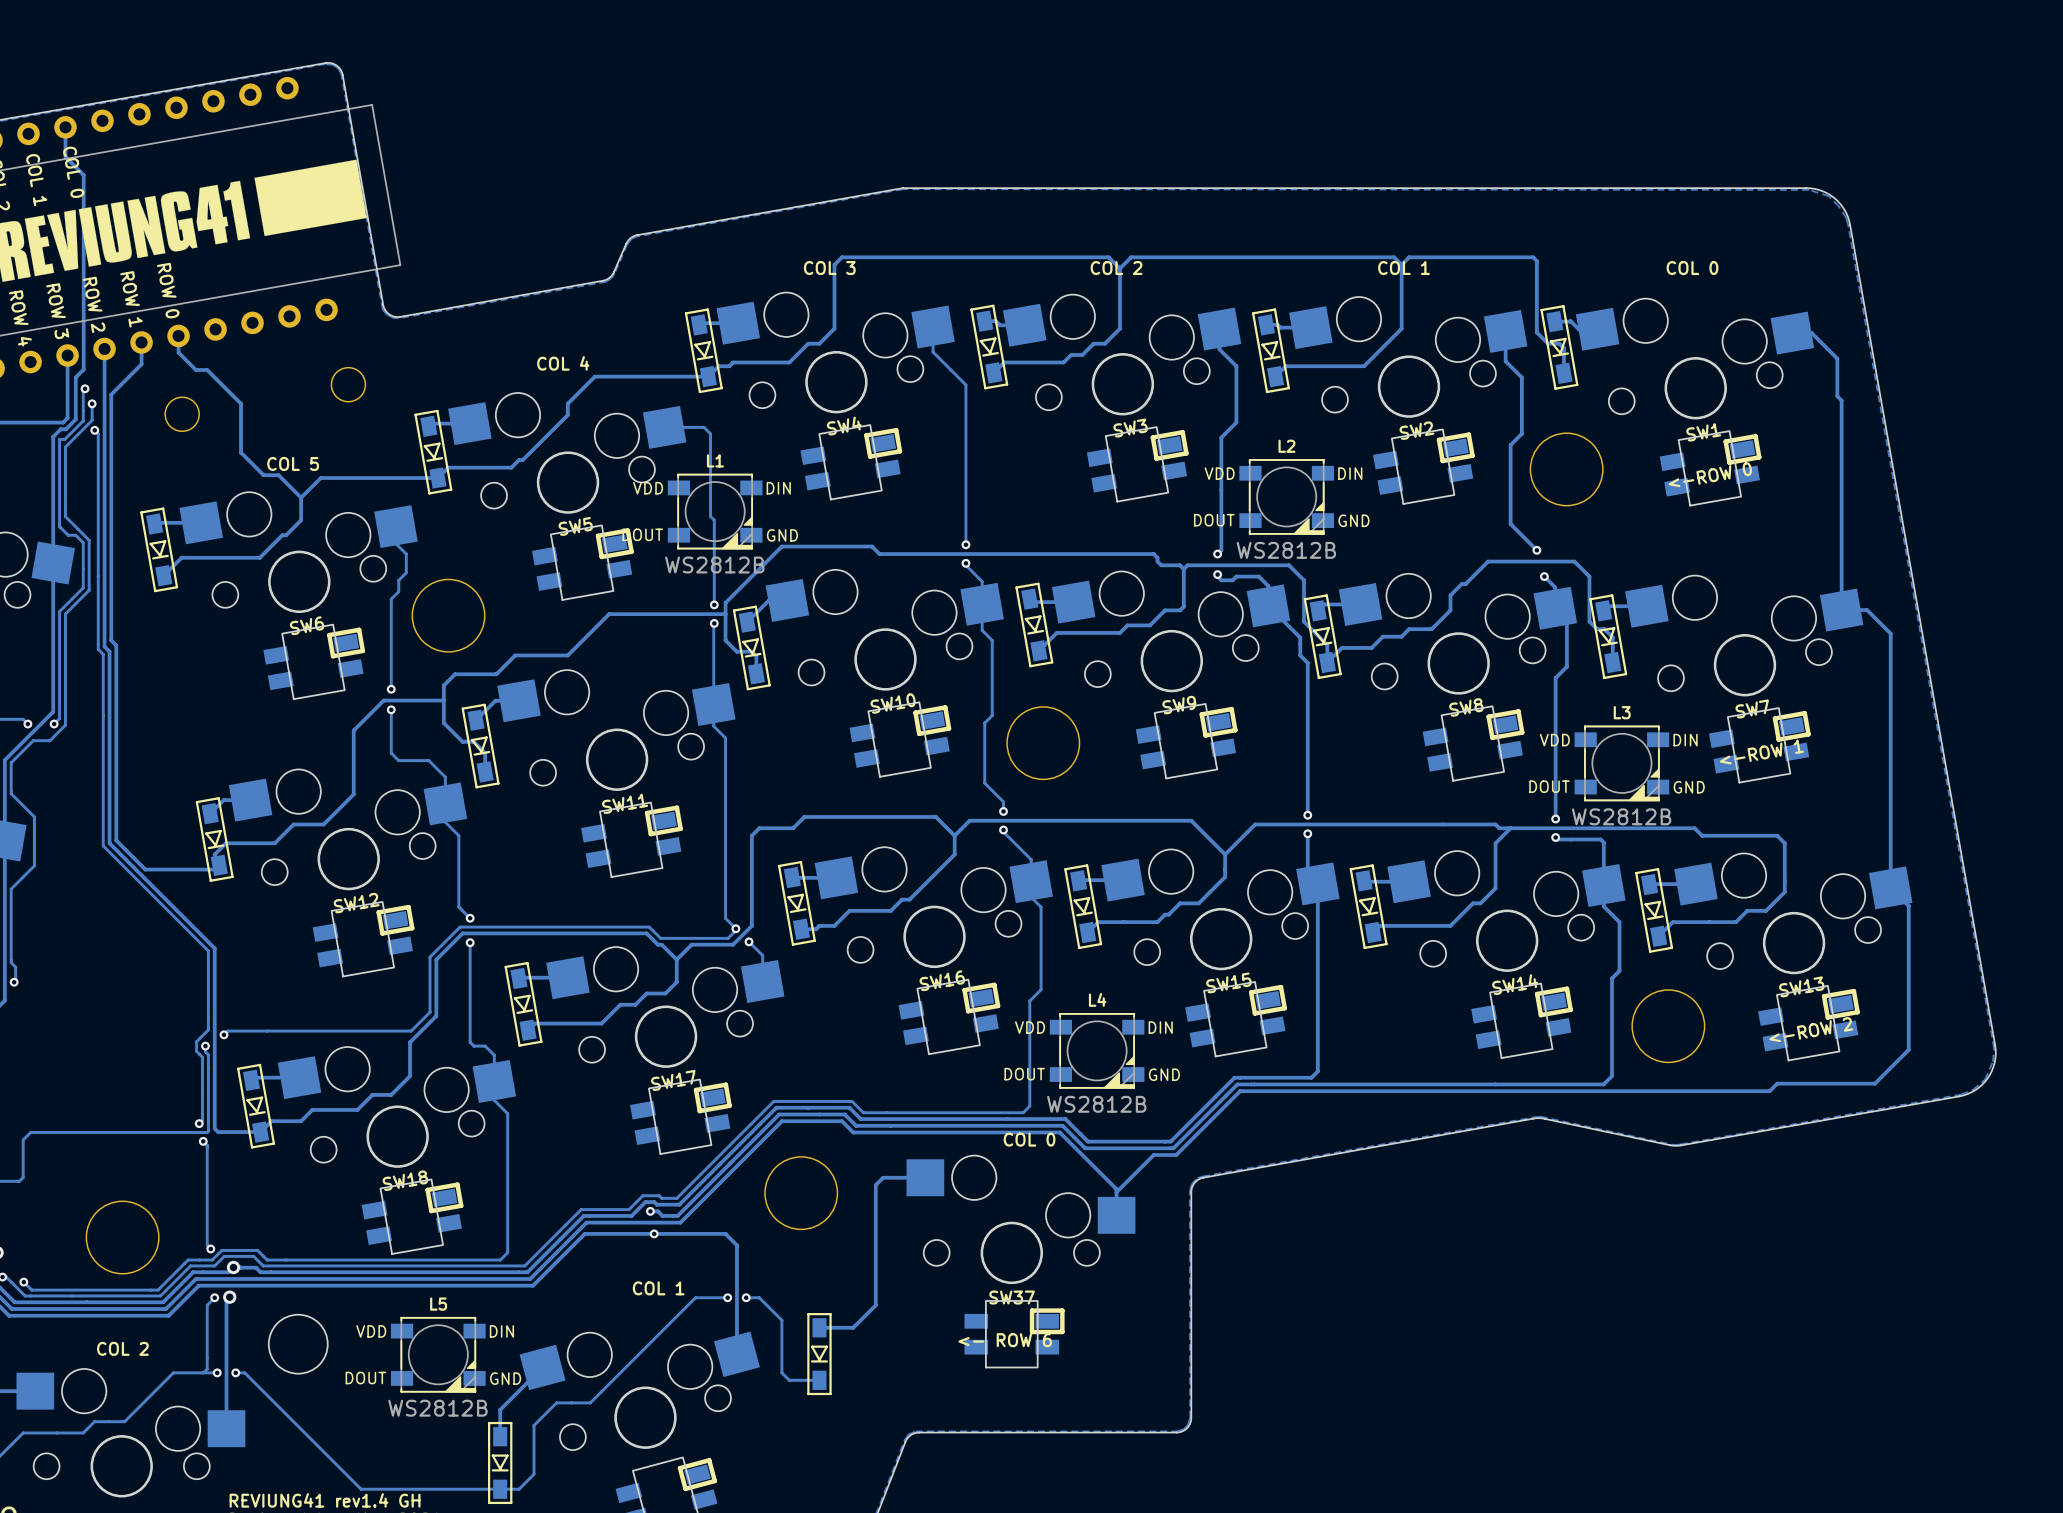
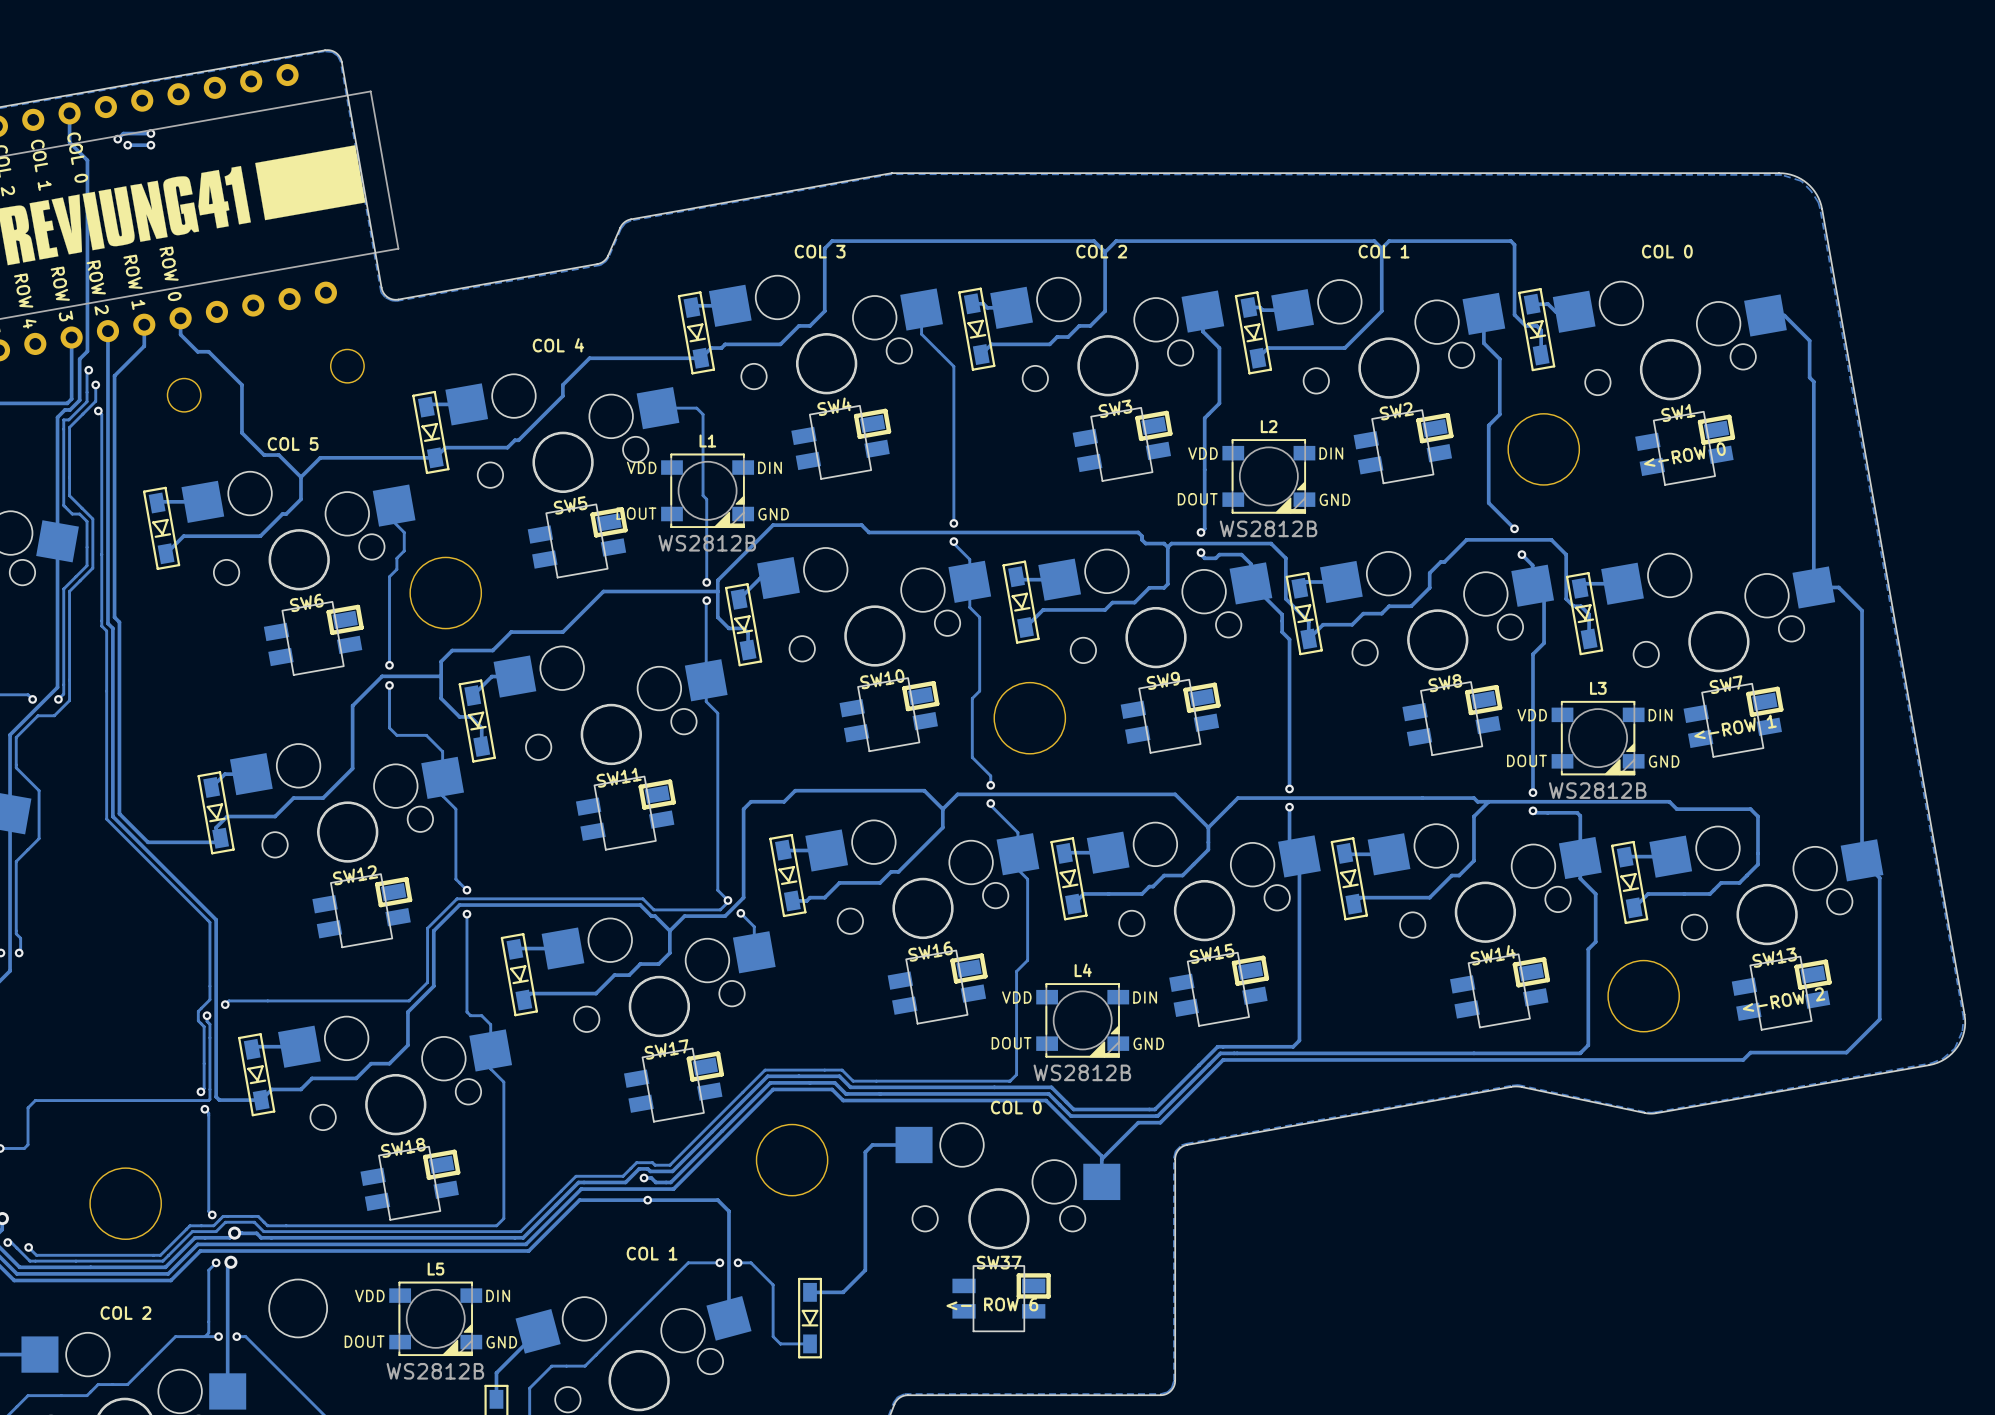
track: none -> (150, 133) (123, 133) (117, 139)
via: none -> (150, 133)
via: none -> (117, 139)
via: none -> (127, 145)
track: none -> (150, 145) (127, 145)
via: none -> (150, 145)

